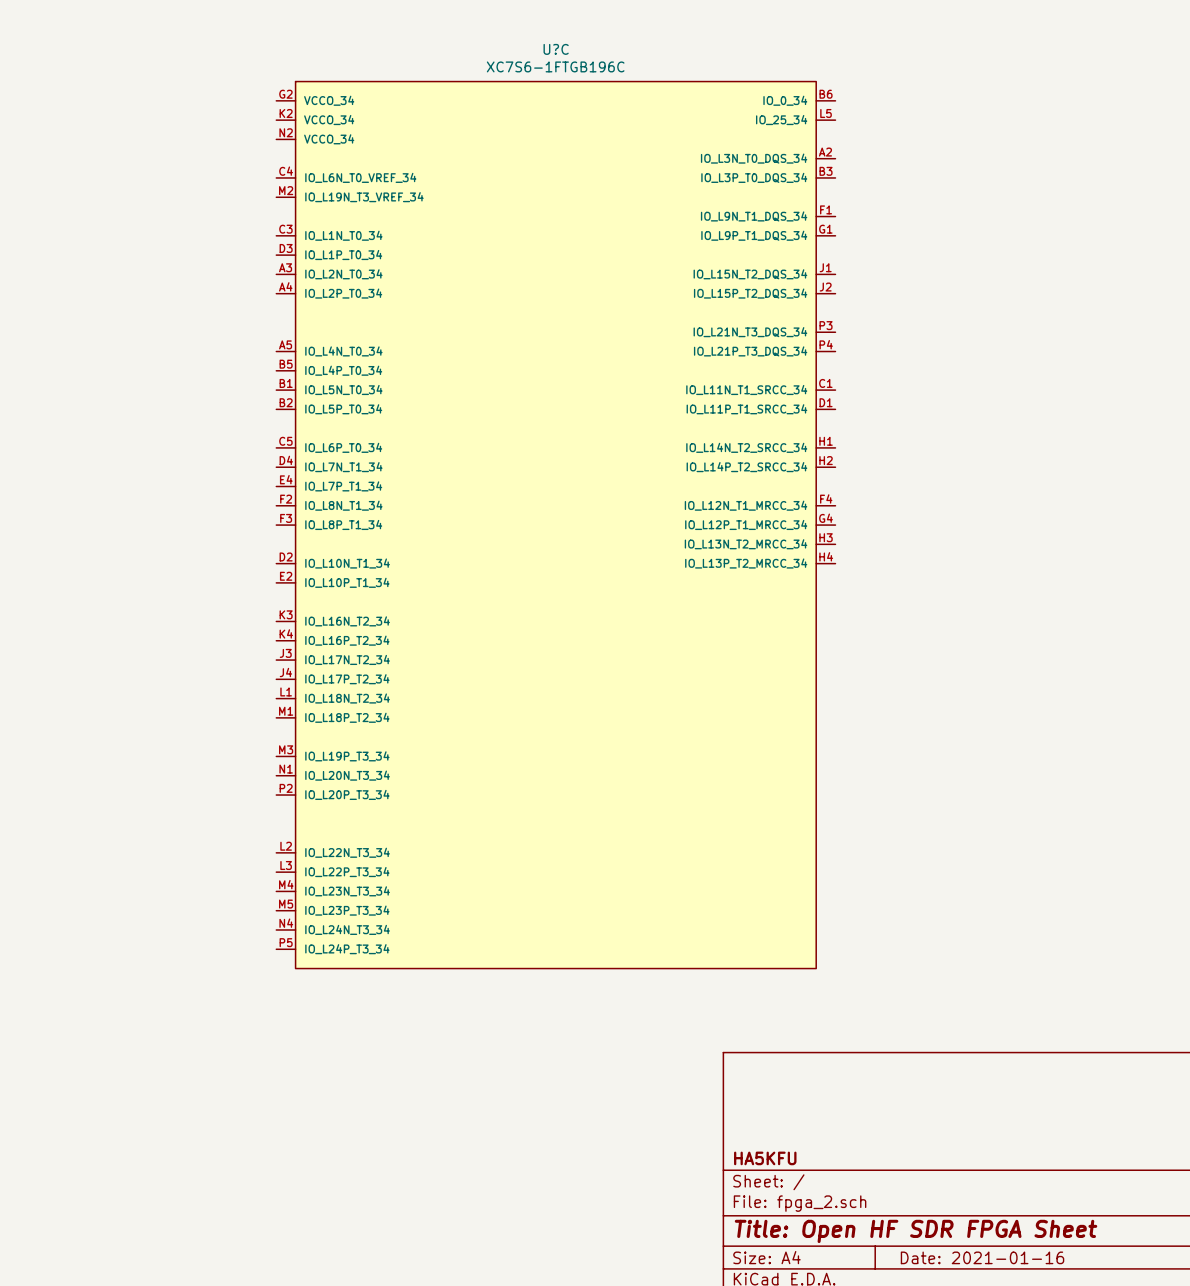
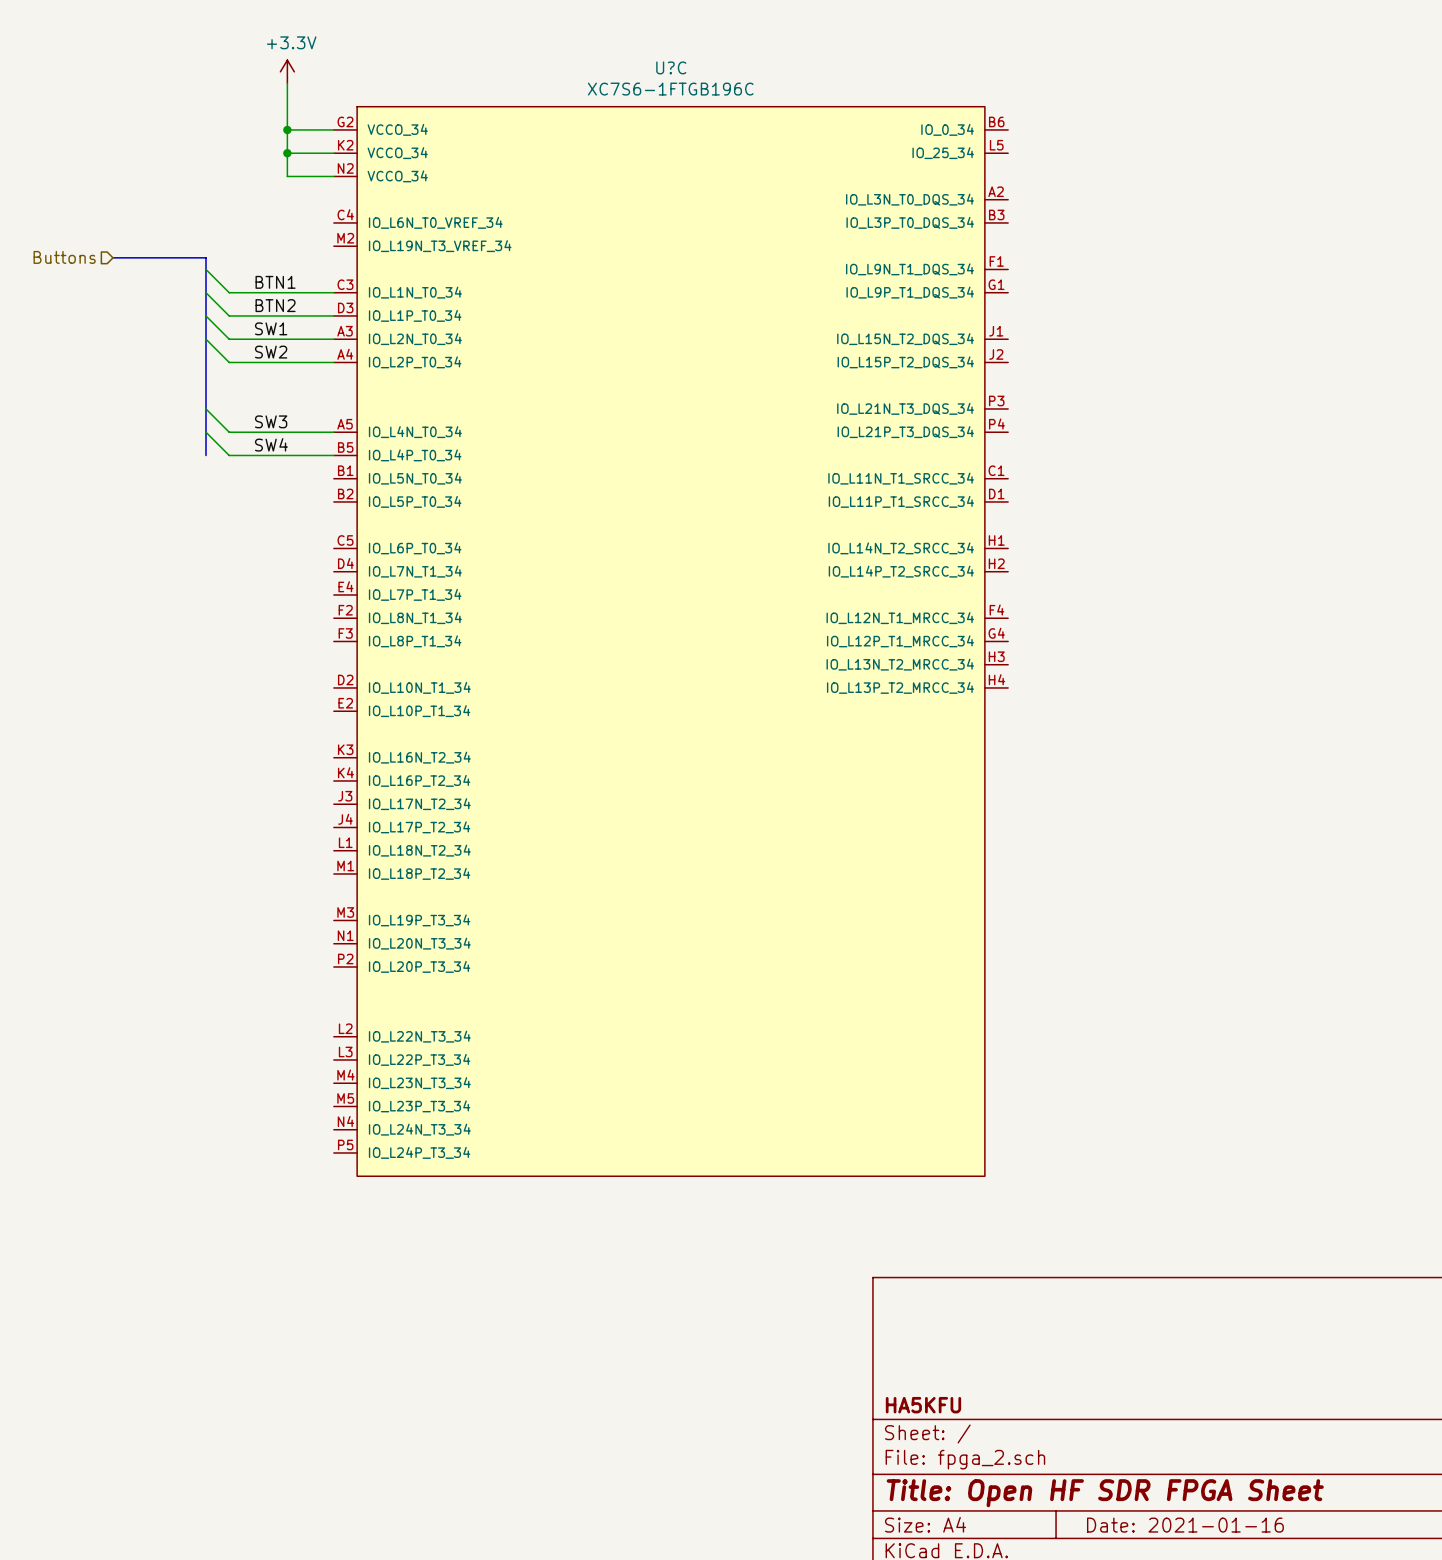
power symbol: none -> +3.3V (287, 71)
wire: none -> (287, 83) (287, 176) (333, 176)
wire: none -> (287, 129) (333, 129)
junction: none -> (287, 129)
wire: none -> (287, 153) (333, 153)
junction: none -> (287, 153)
hierarchical label: none -> Buttons (64, 257)
bus: none -> (112, 257) (205, 257) (205, 455)
wire: none -> (205, 269) (229, 292) (333, 292)
label: none -> BTN1 (275, 282)
wire: none -> (205, 292) (229, 315) (333, 315)
label: none -> BTN2 (275, 305)
wire: none -> (205, 315) (229, 339) (333, 339)
label: none -> SW1 (271, 328)
wire: none -> (205, 339) (229, 362) (333, 362)
label: none -> SW2 (271, 352)
wire: none -> (205, 408) (229, 432) (333, 432)
label: none -> SW3 (271, 421)
wire: none -> (205, 432) (229, 455) (333, 455)
label: none -> SW4 (271, 444)

